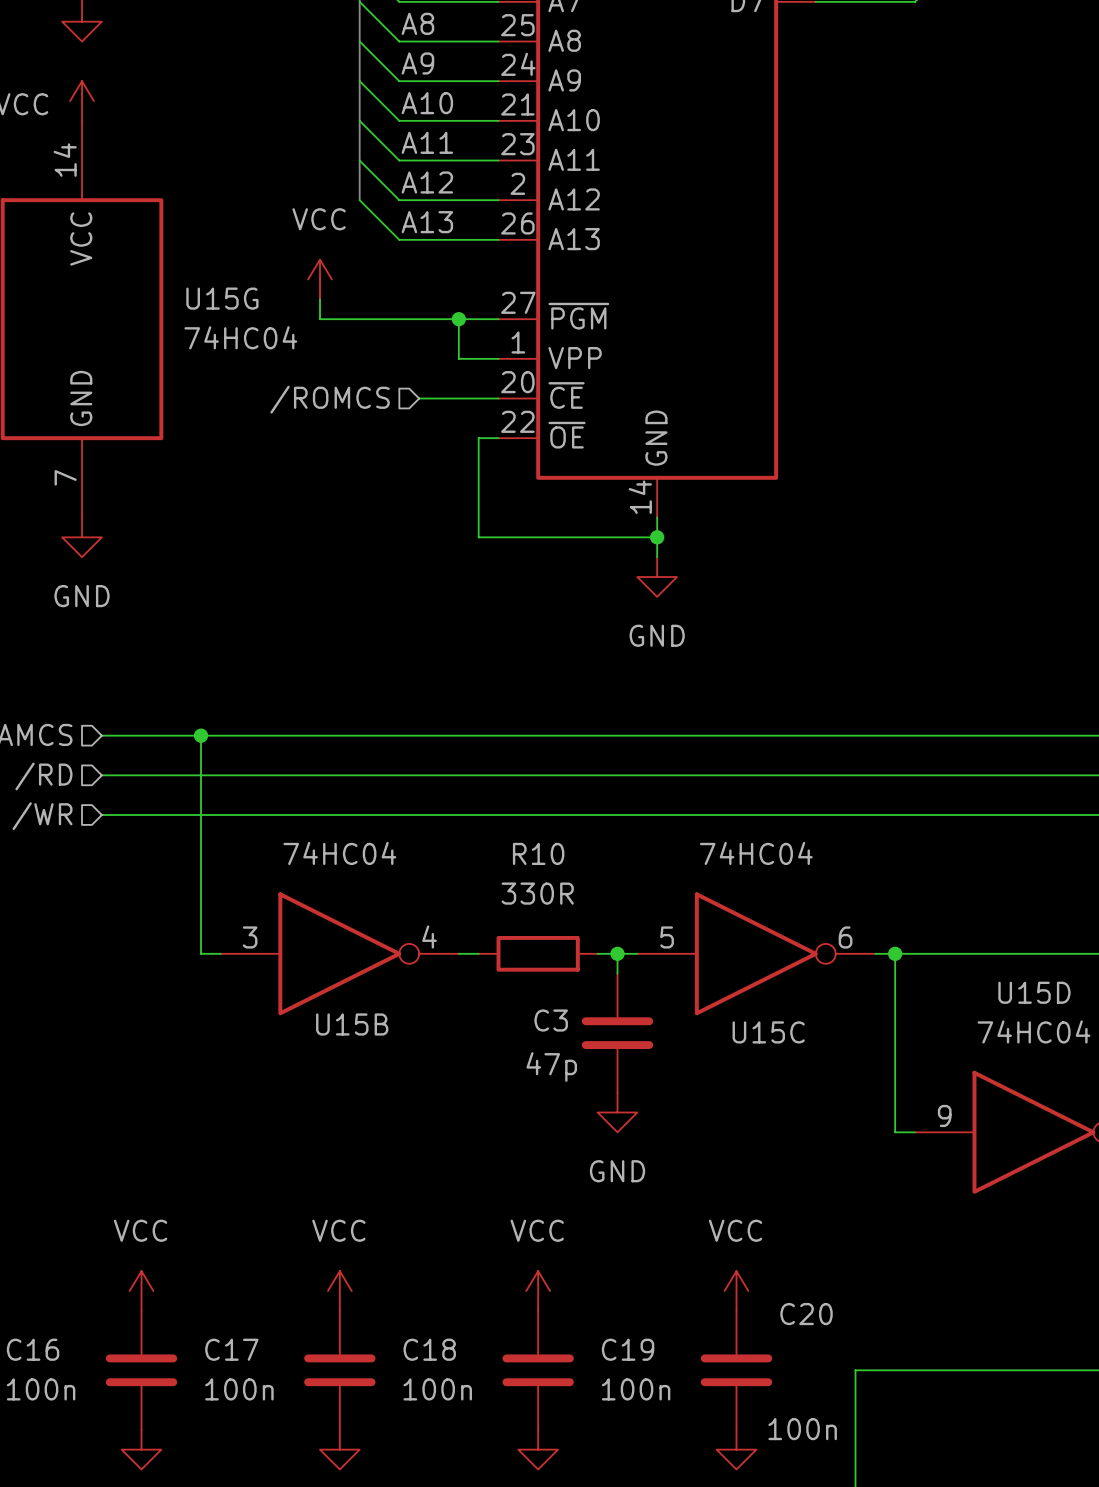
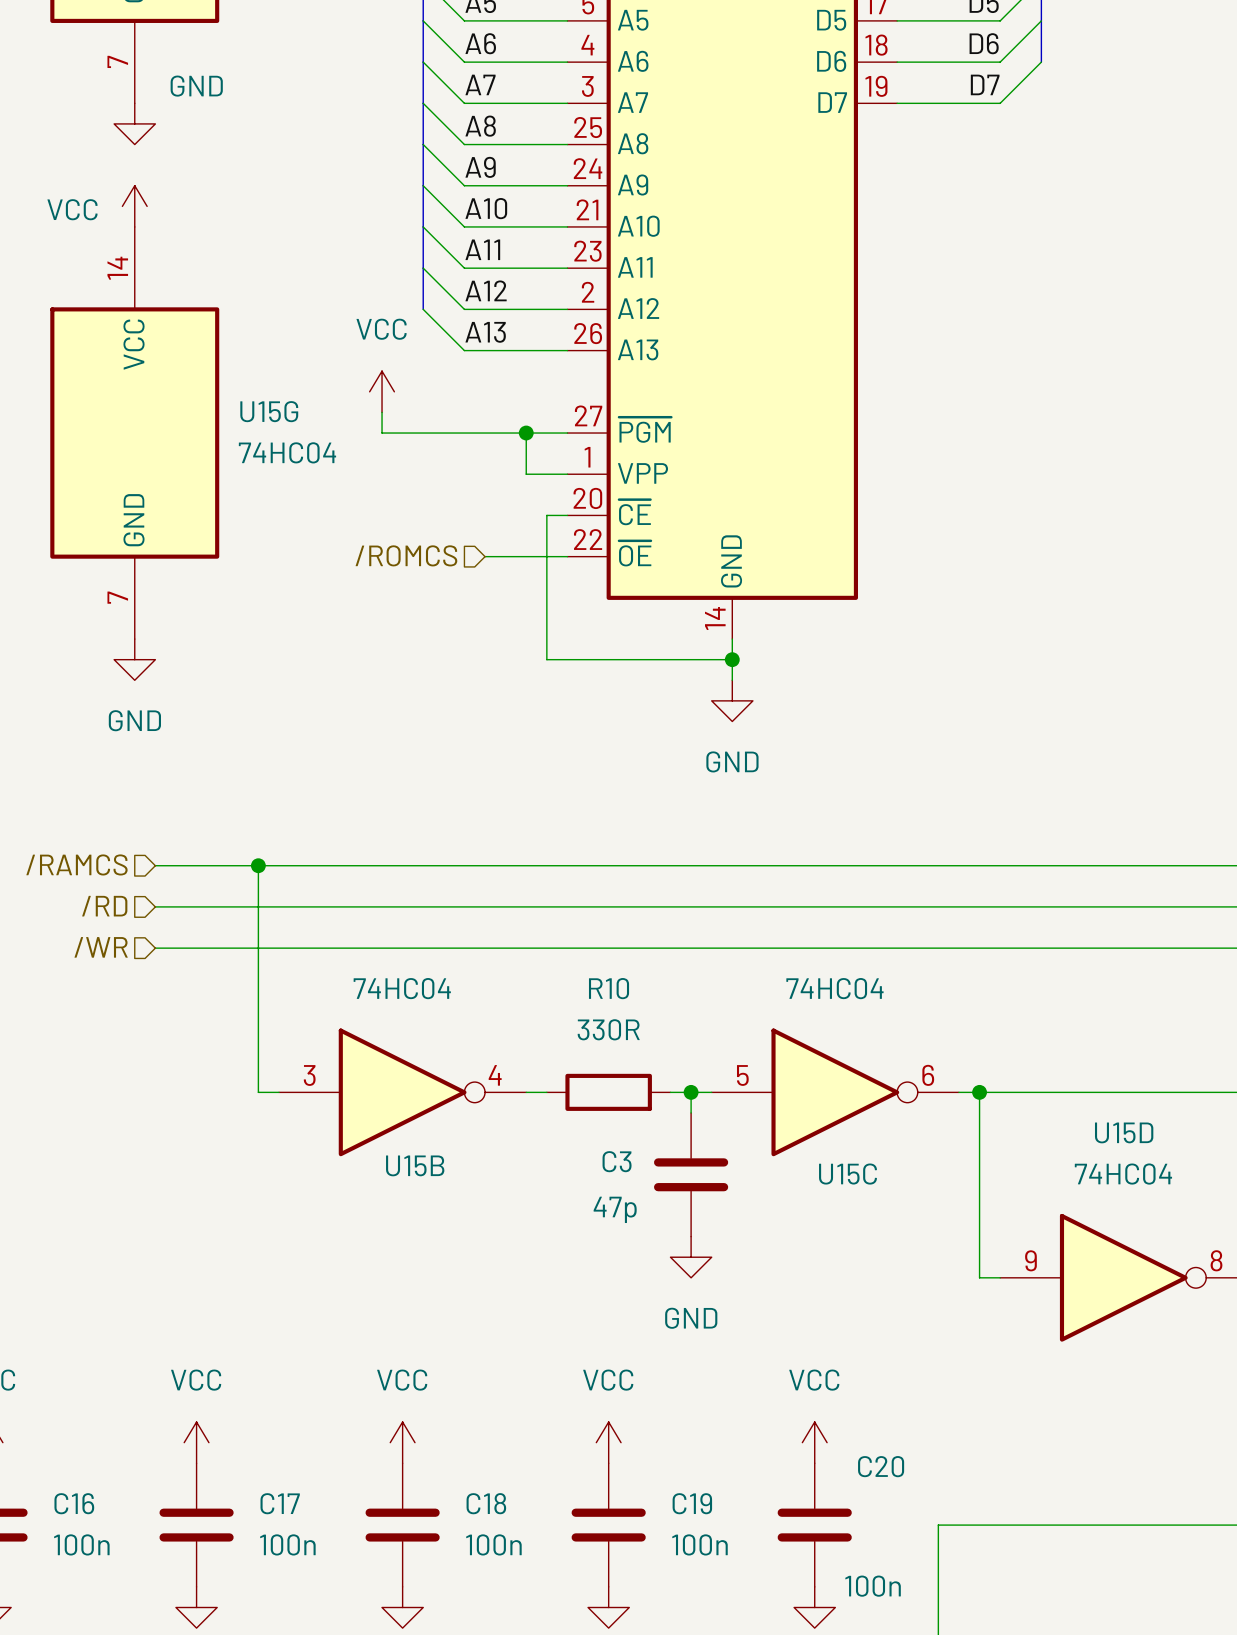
wire: (419, 398) (478, 398) -> (485, 556) (546, 556) (546, 515)
hierarchical label position: /ROMCS (330, 399) -> /ROMCS (406, 555)

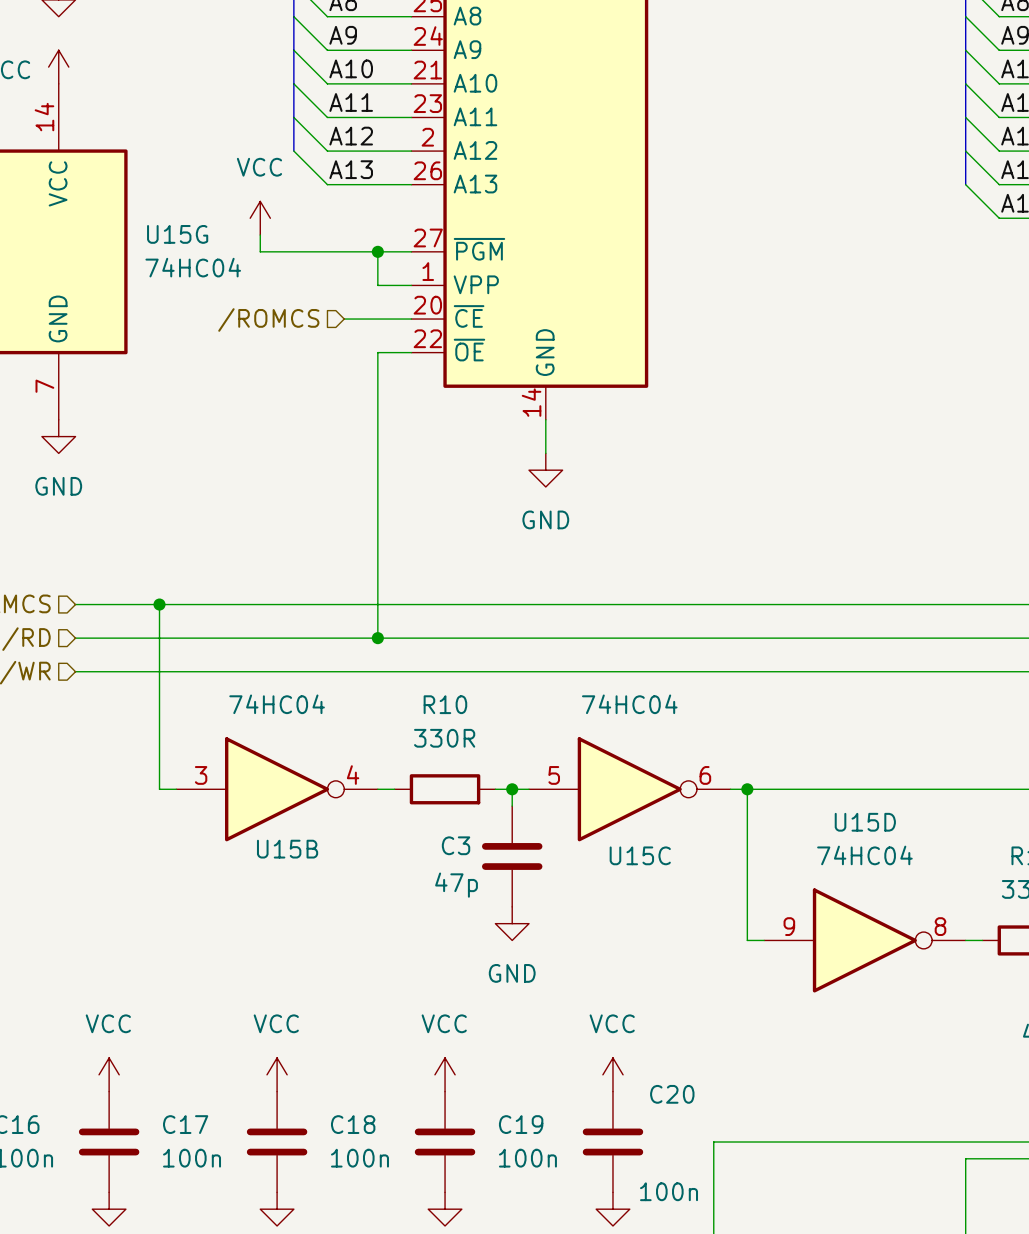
wire: (546, 515) (546, 659) (732, 659) -> (394, 319) (344, 319)
hierarchical label position: /ROMCS (406, 555) -> /ROMCS (268, 319)
wire: (485, 556) (526, 556) -> (377, 638) (377, 352)
junction: (732, 659) -> none
junction: none -> (377, 638)

